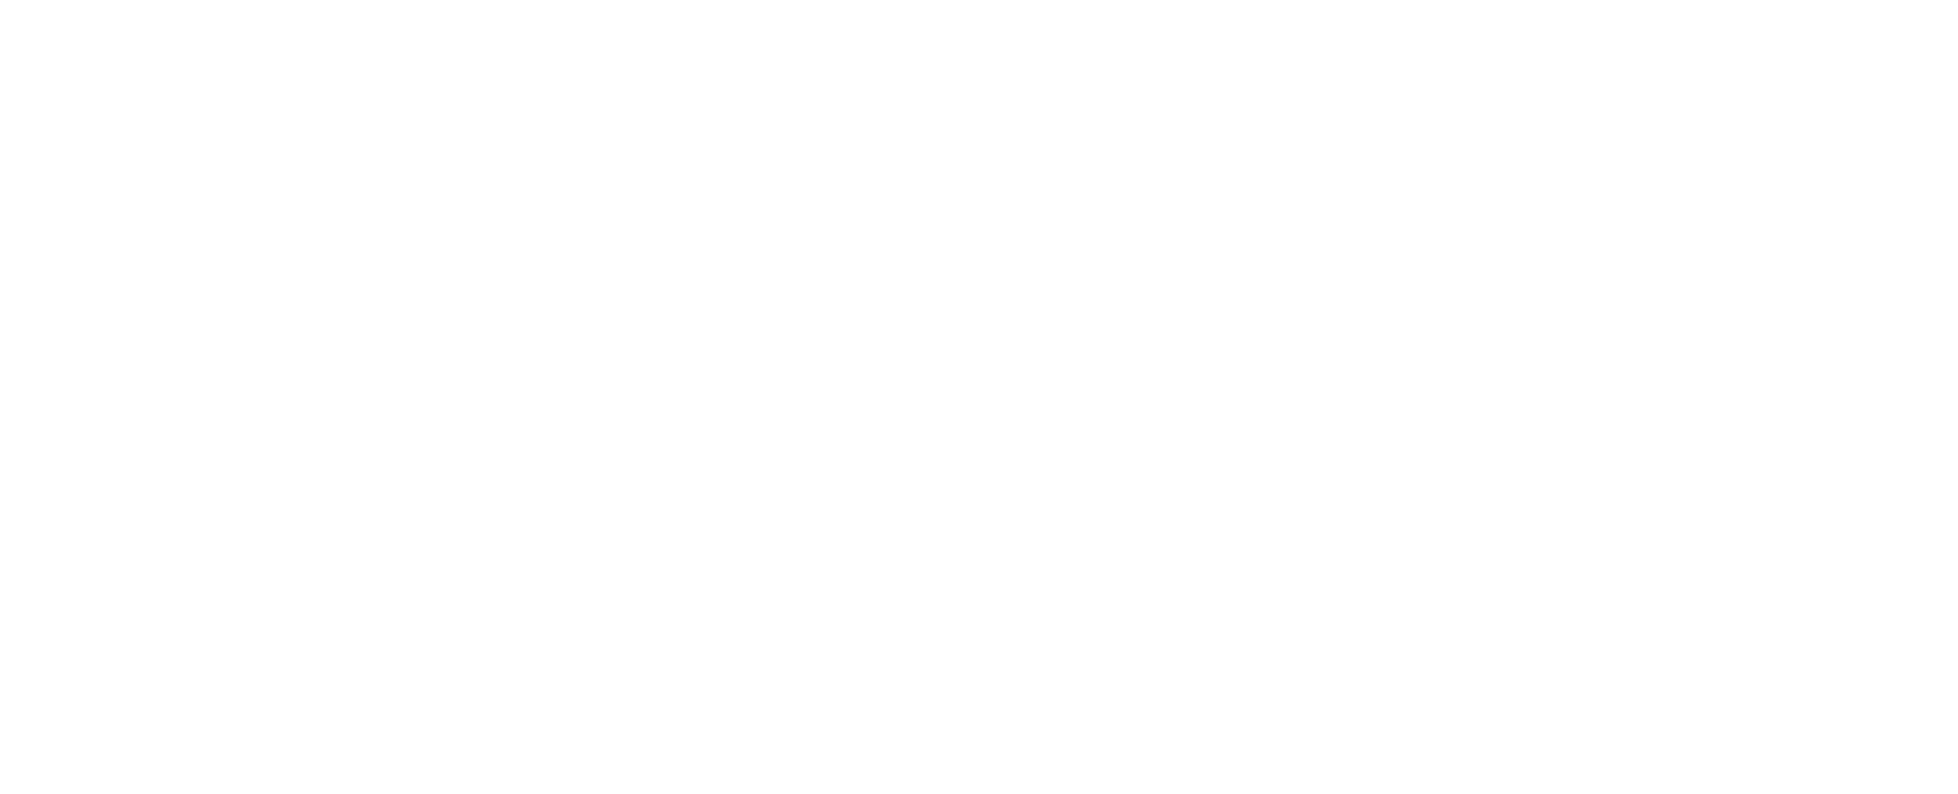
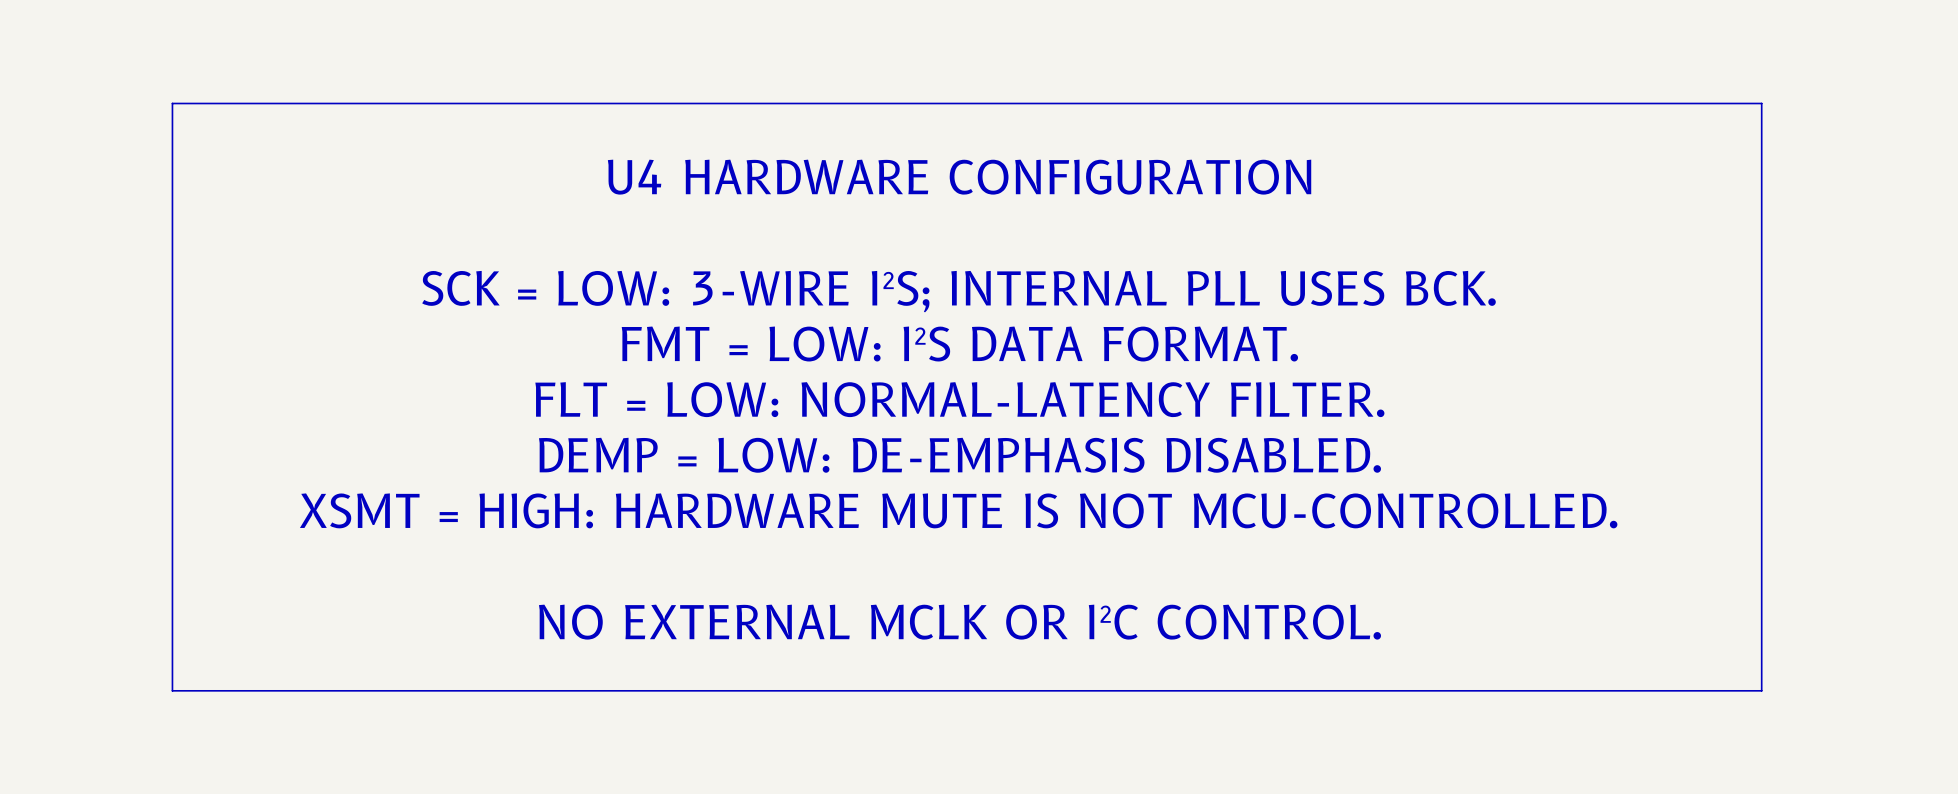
line: none -> (172, 103) (1761, 103) (1761, 690) (172, 690) (172, 103)
text: none -> U4 HARDWARE CONFIGURATION (959, 177)
text: none -> SCK = LOW: 3-WIRE I²S; INTERNAL PLL USES BCK. (958, 291)
text: none -> FMT = LOW: I²S DATA FORMAT. (959, 344)
text: none -> FLT = LOW: NORMAL-LATENCY FILTER. (959, 399)
text: none -> DEMP = LOW: DE-EMPHASIS DISABLED. (959, 455)
text: none -> XSMT = HIGH: HARDWARE MUTE IS NOT MCU-CONTROLLED. (958, 510)
text: none -> NO EXTERNAL MCLK OR I²C CONTROL. (959, 622)

